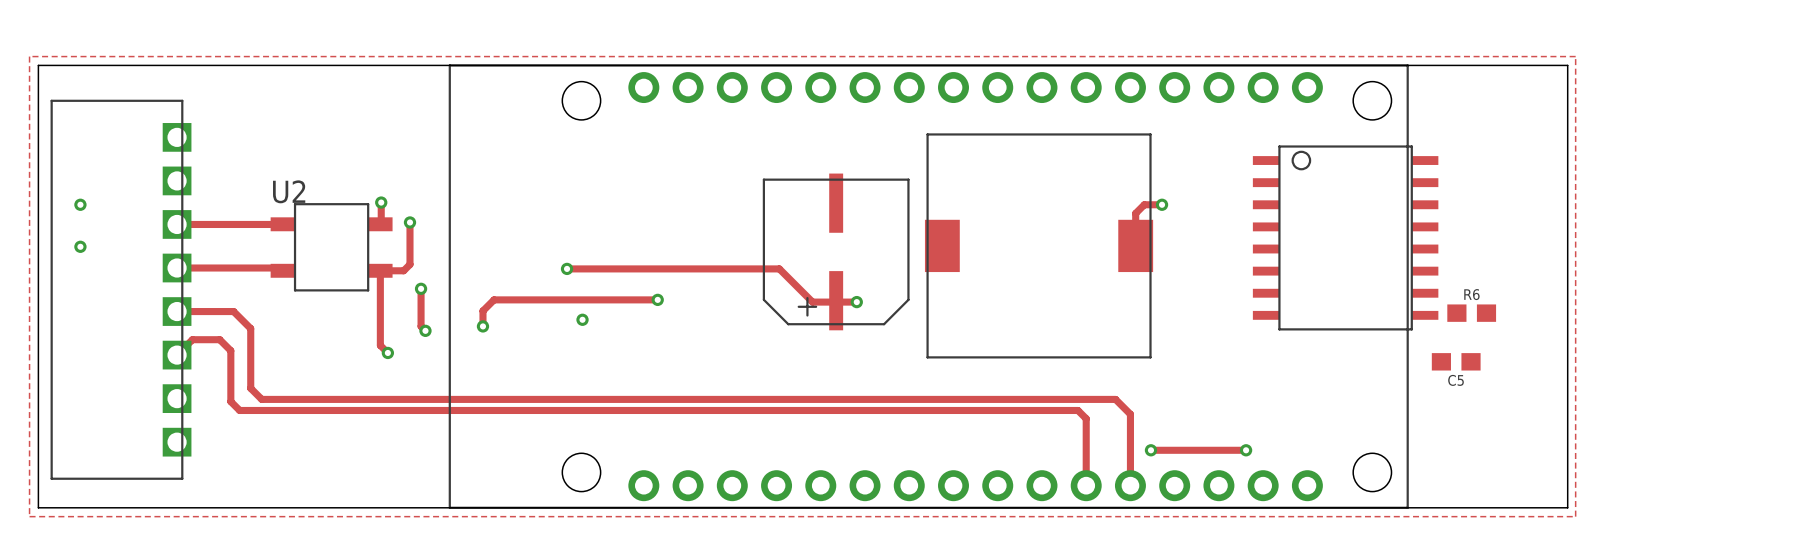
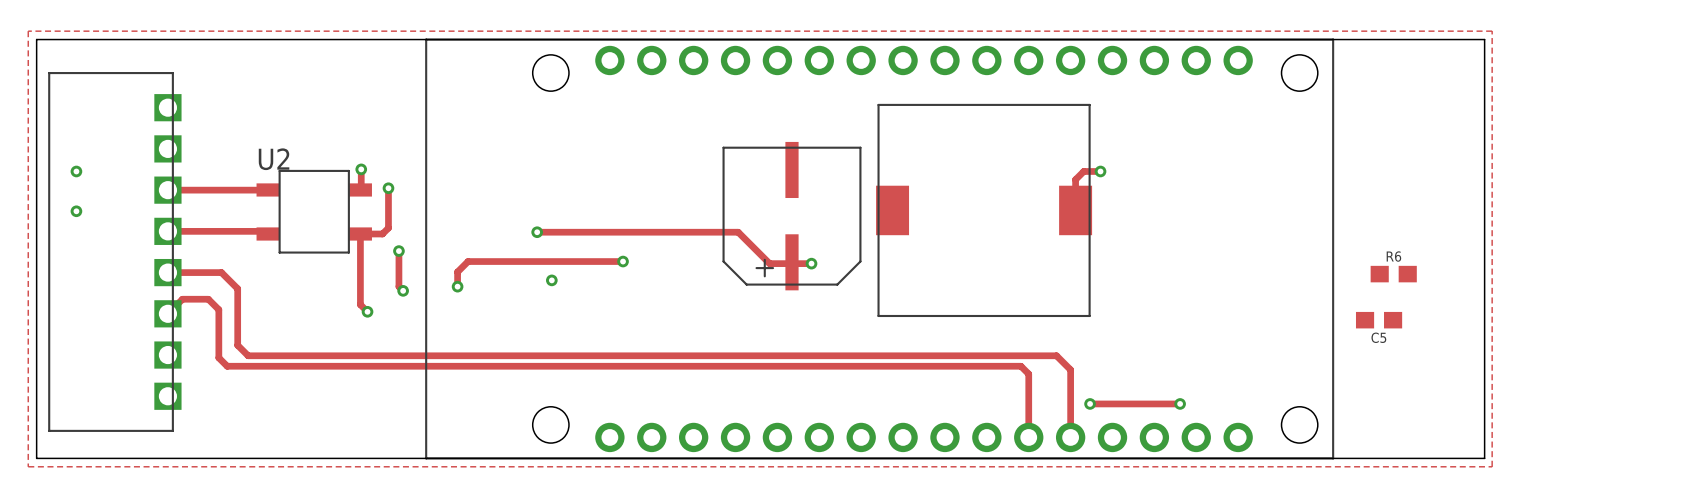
part: (1345, 237) -> none

